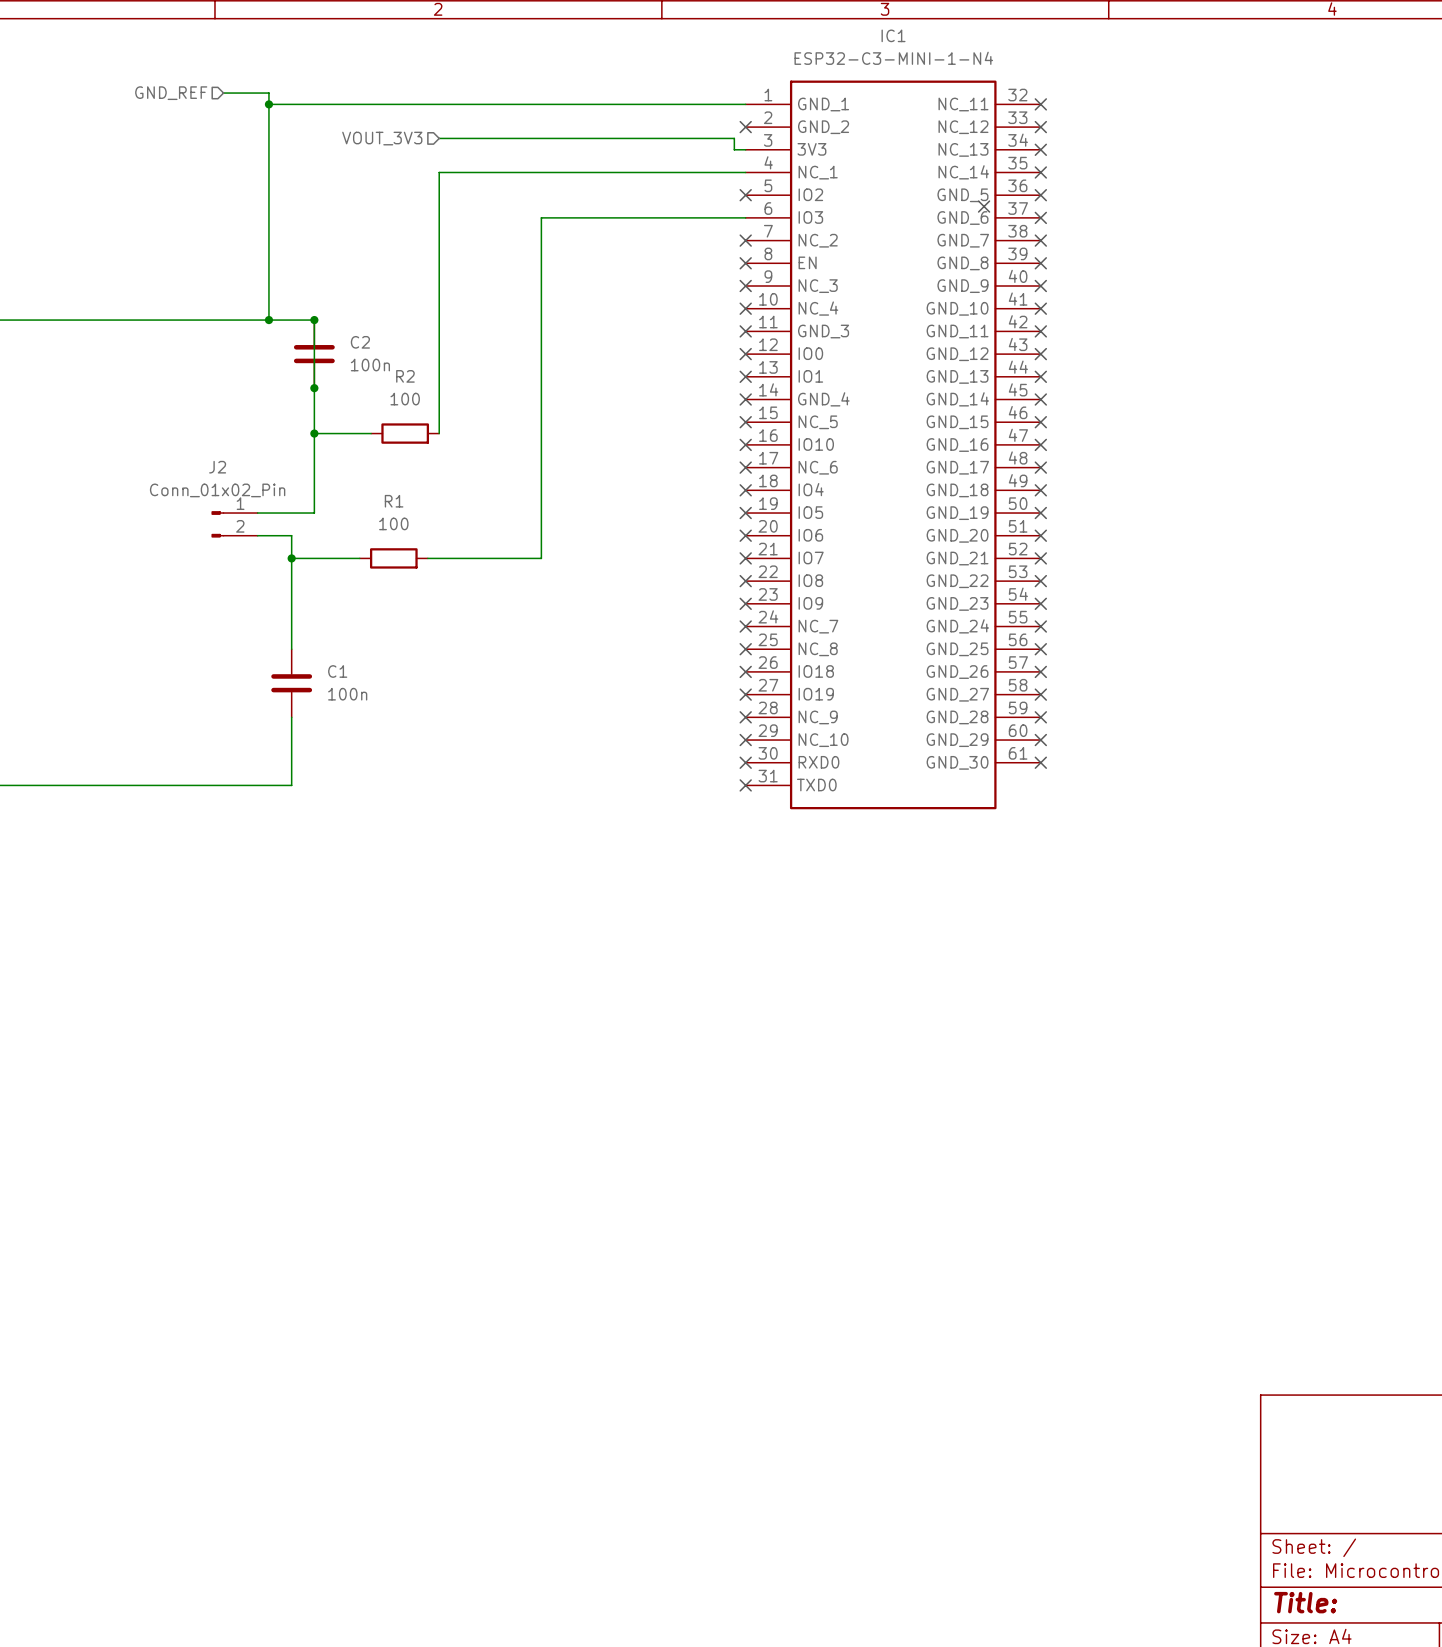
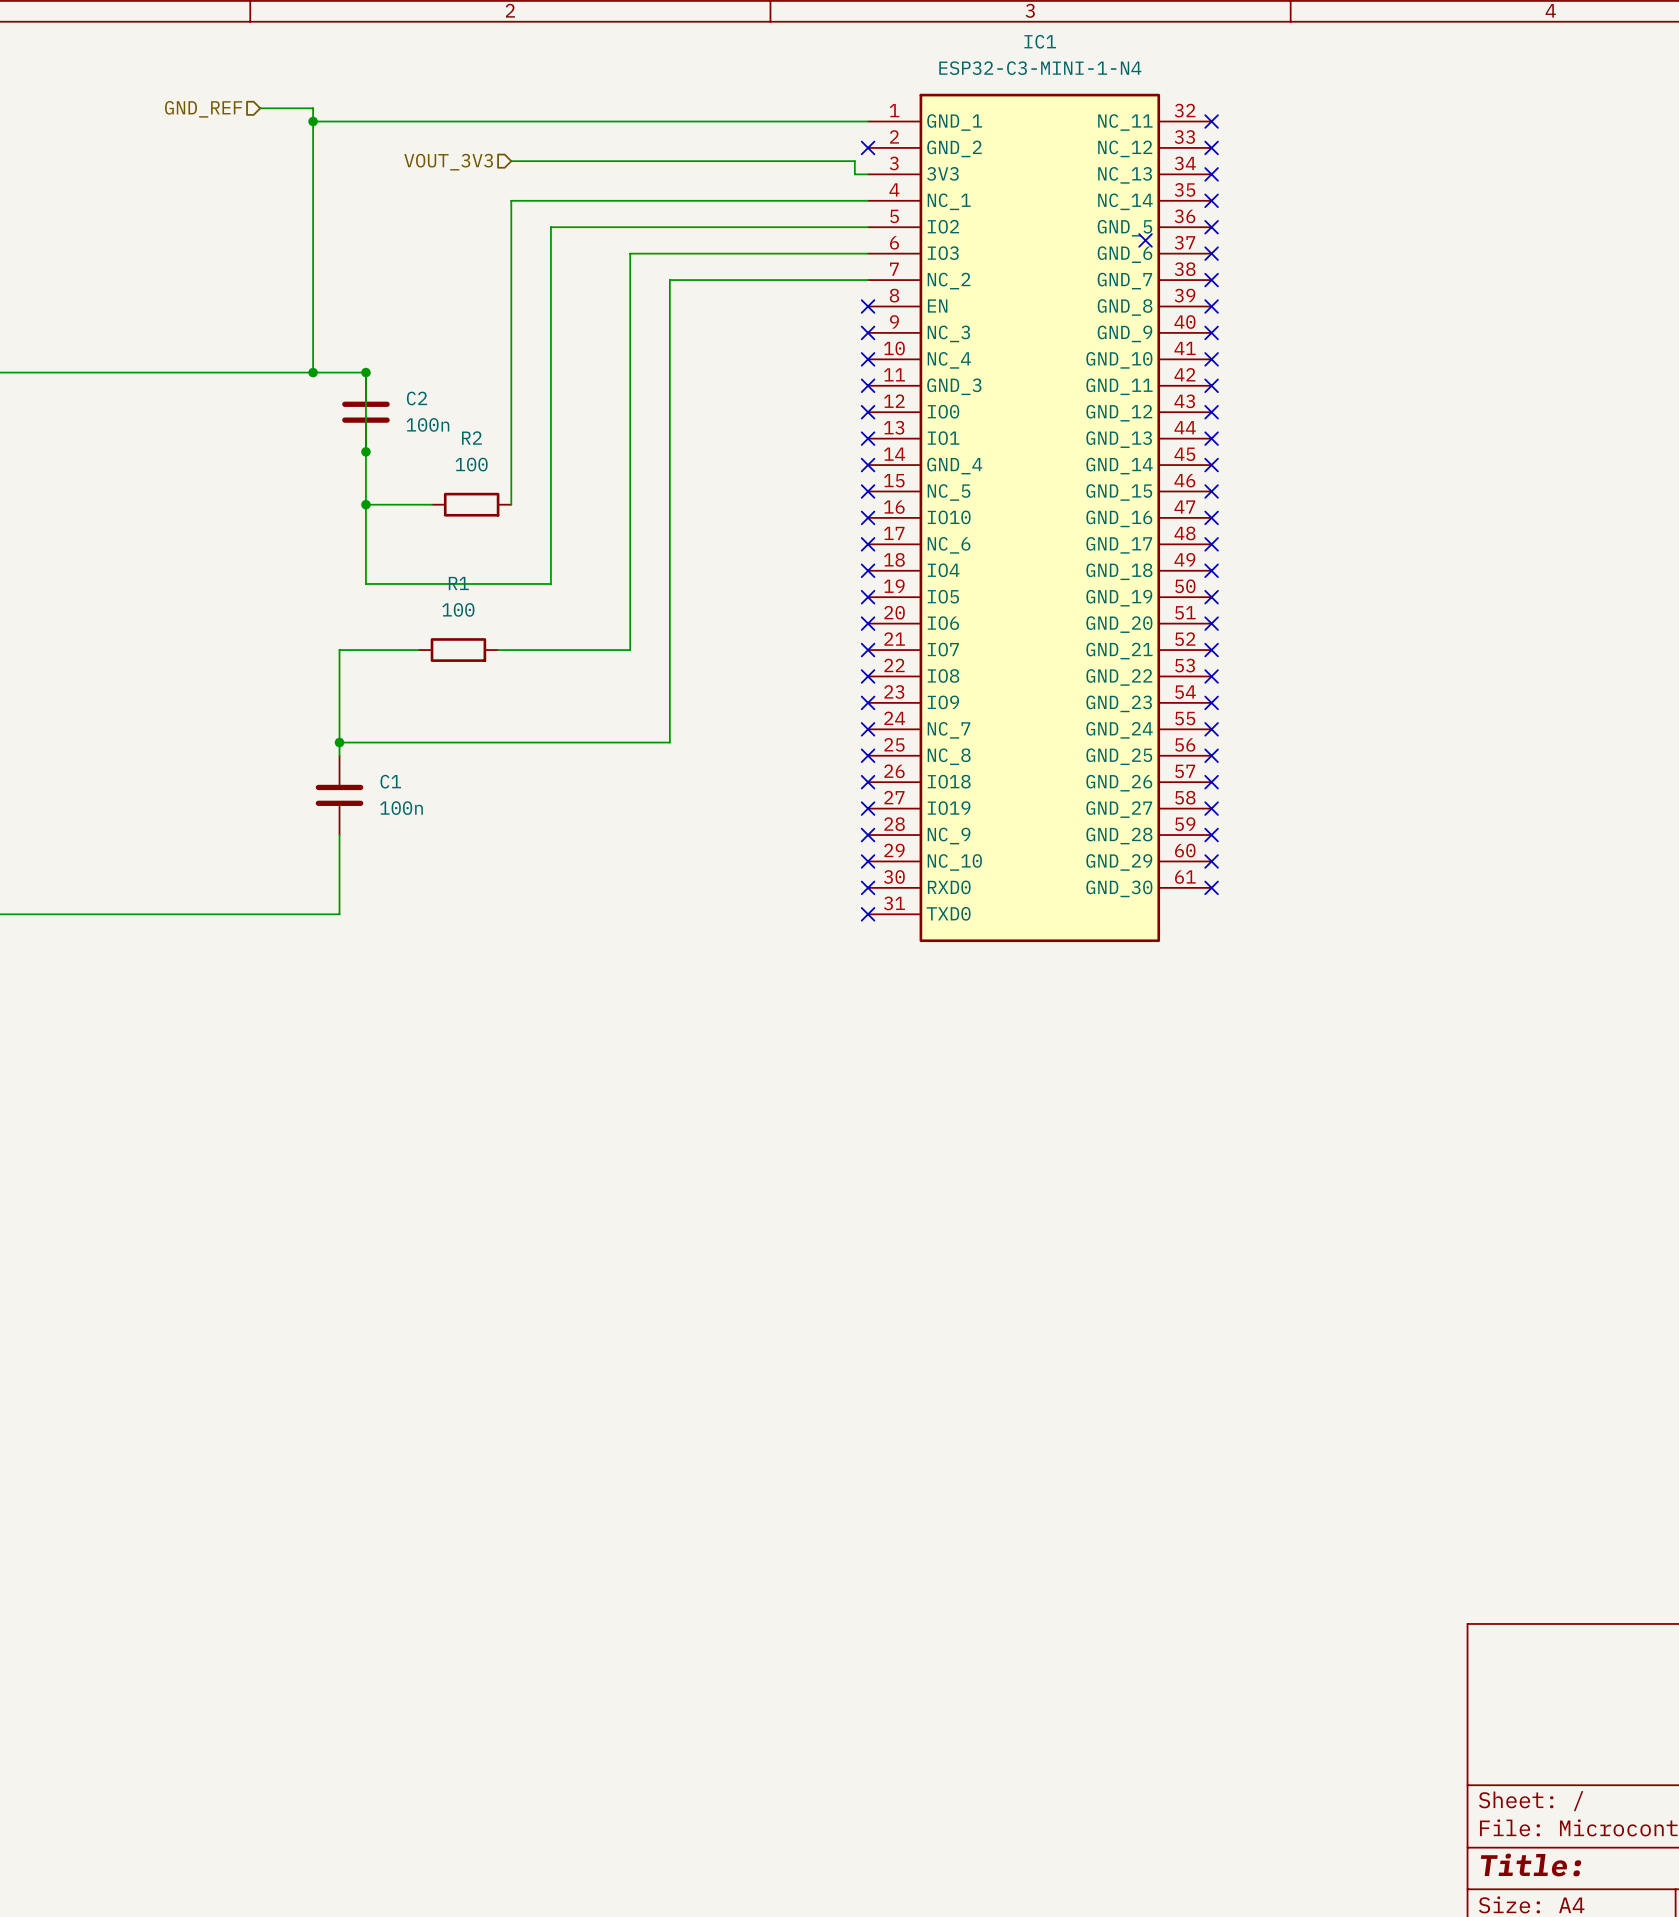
no-connect mark: (745, 195) -> none
wire: none -> (868, 280) (669, 280) (669, 742) (339, 742)
no-connect mark: (745, 240) -> none
wire: (314, 501) (314, 513) (257, 513) -> (365, 583) (550, 583) (550, 227) (868, 227)
J2: Conn_01x02_Pin (234, 524) -> none
wire: (257, 535) (291, 535) (291, 558) -> none
junction: (291, 558) -> none
junction: none -> (339, 742)

